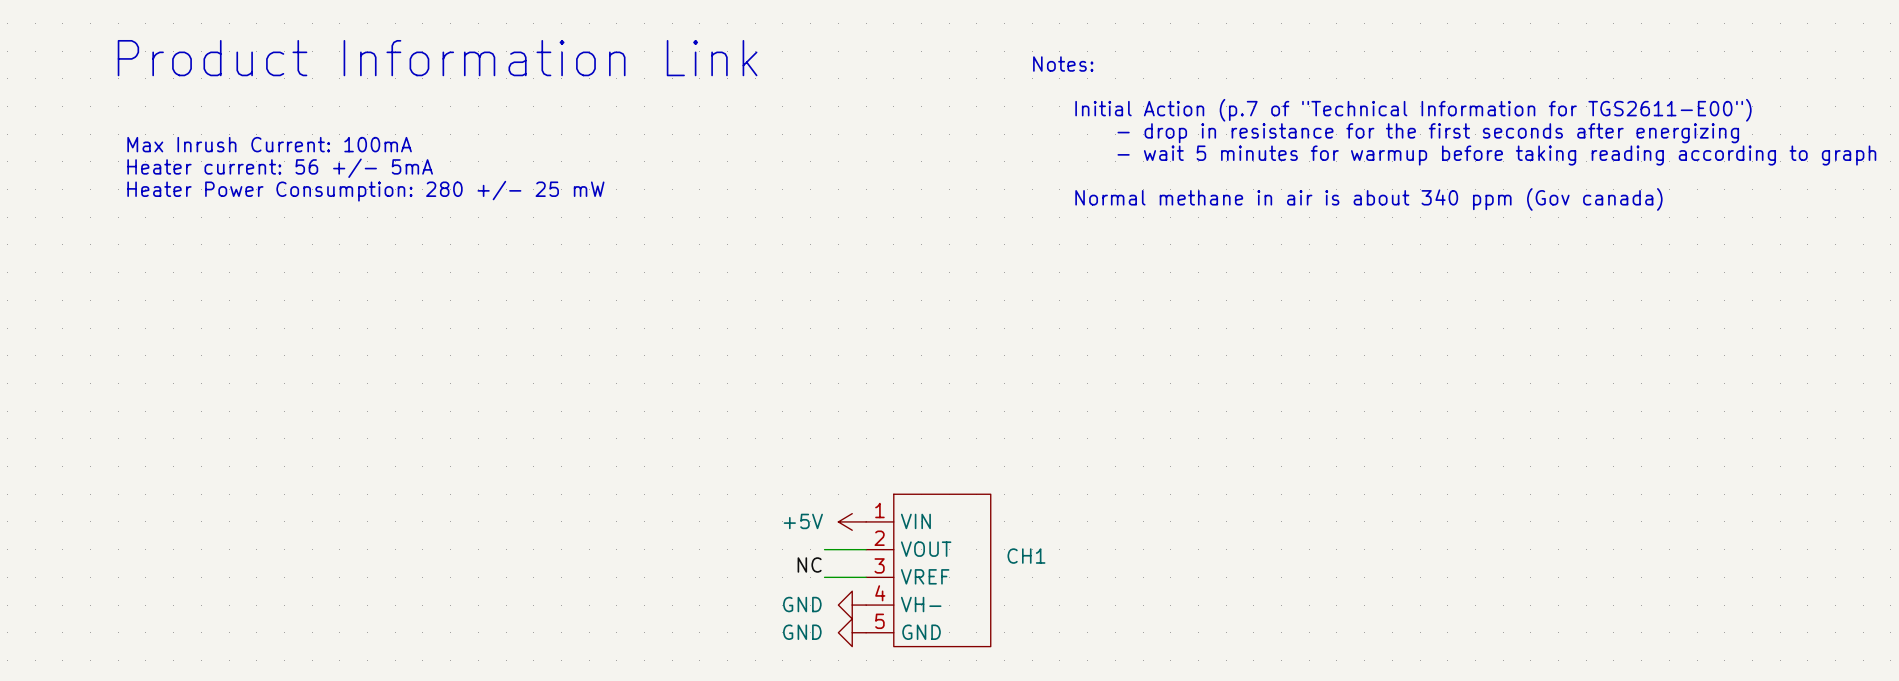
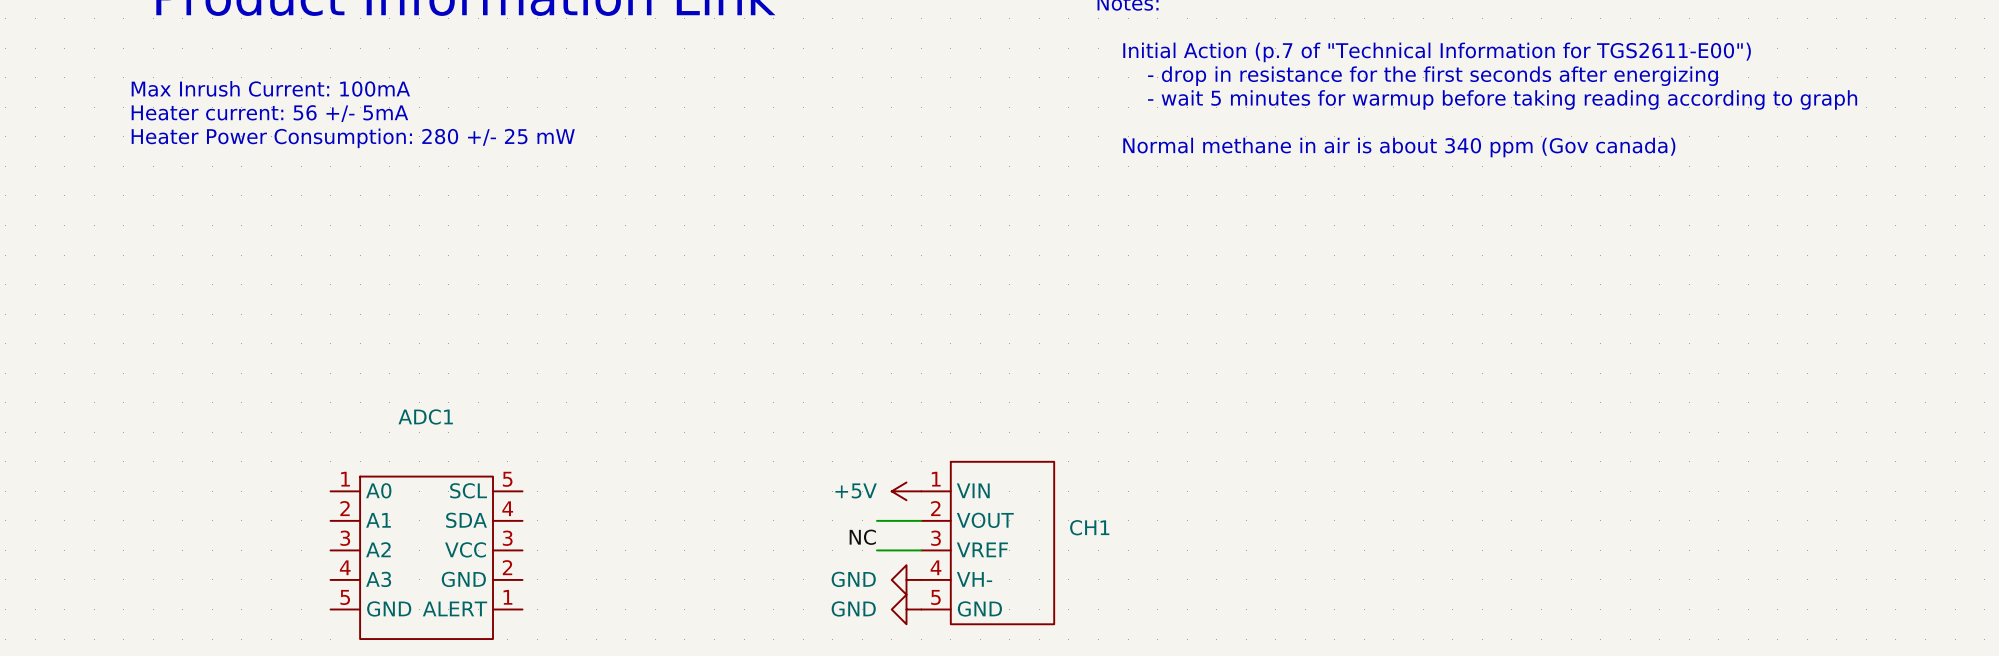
ADC1: none -> (426, 557)

